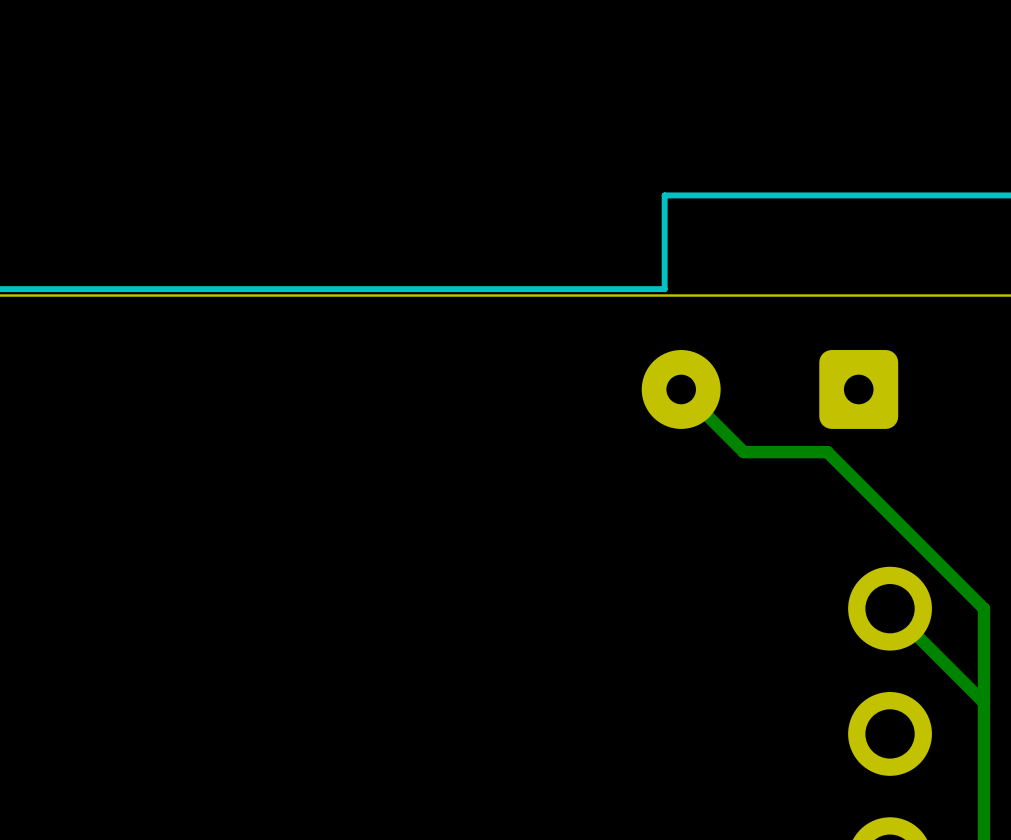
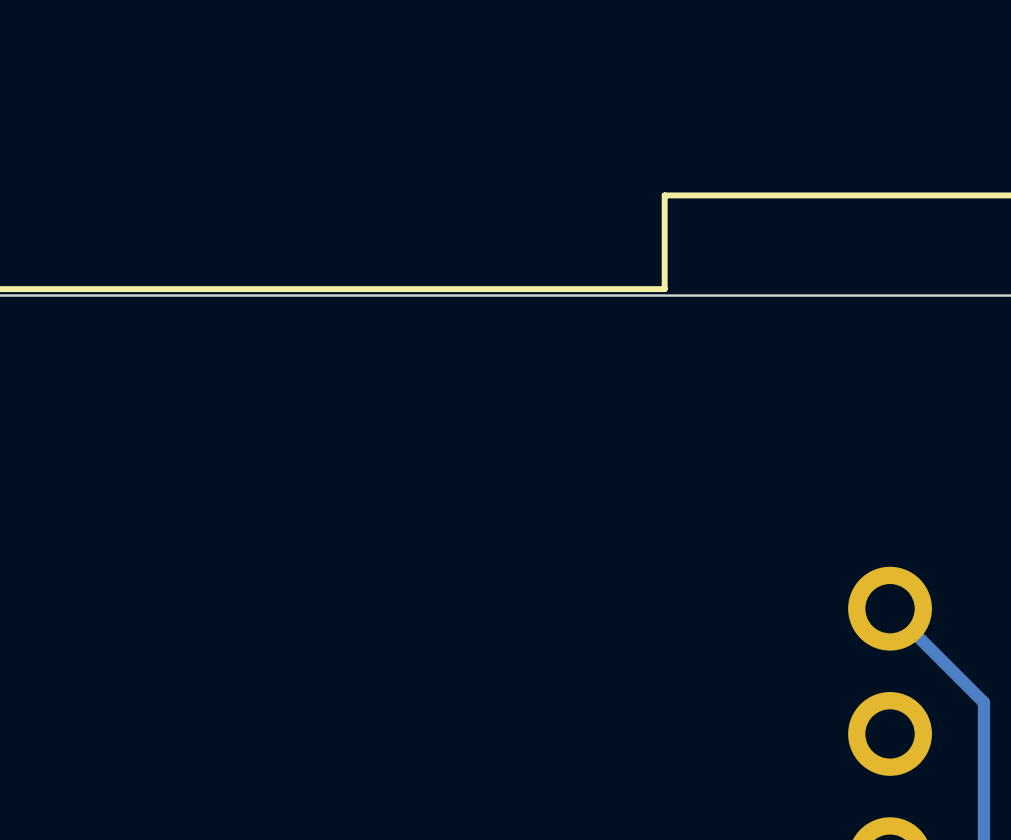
track: (681, 389) (743, 452) (827, 452) (983, 608) (983, 702) -> none
part: (769, 389) -> none

